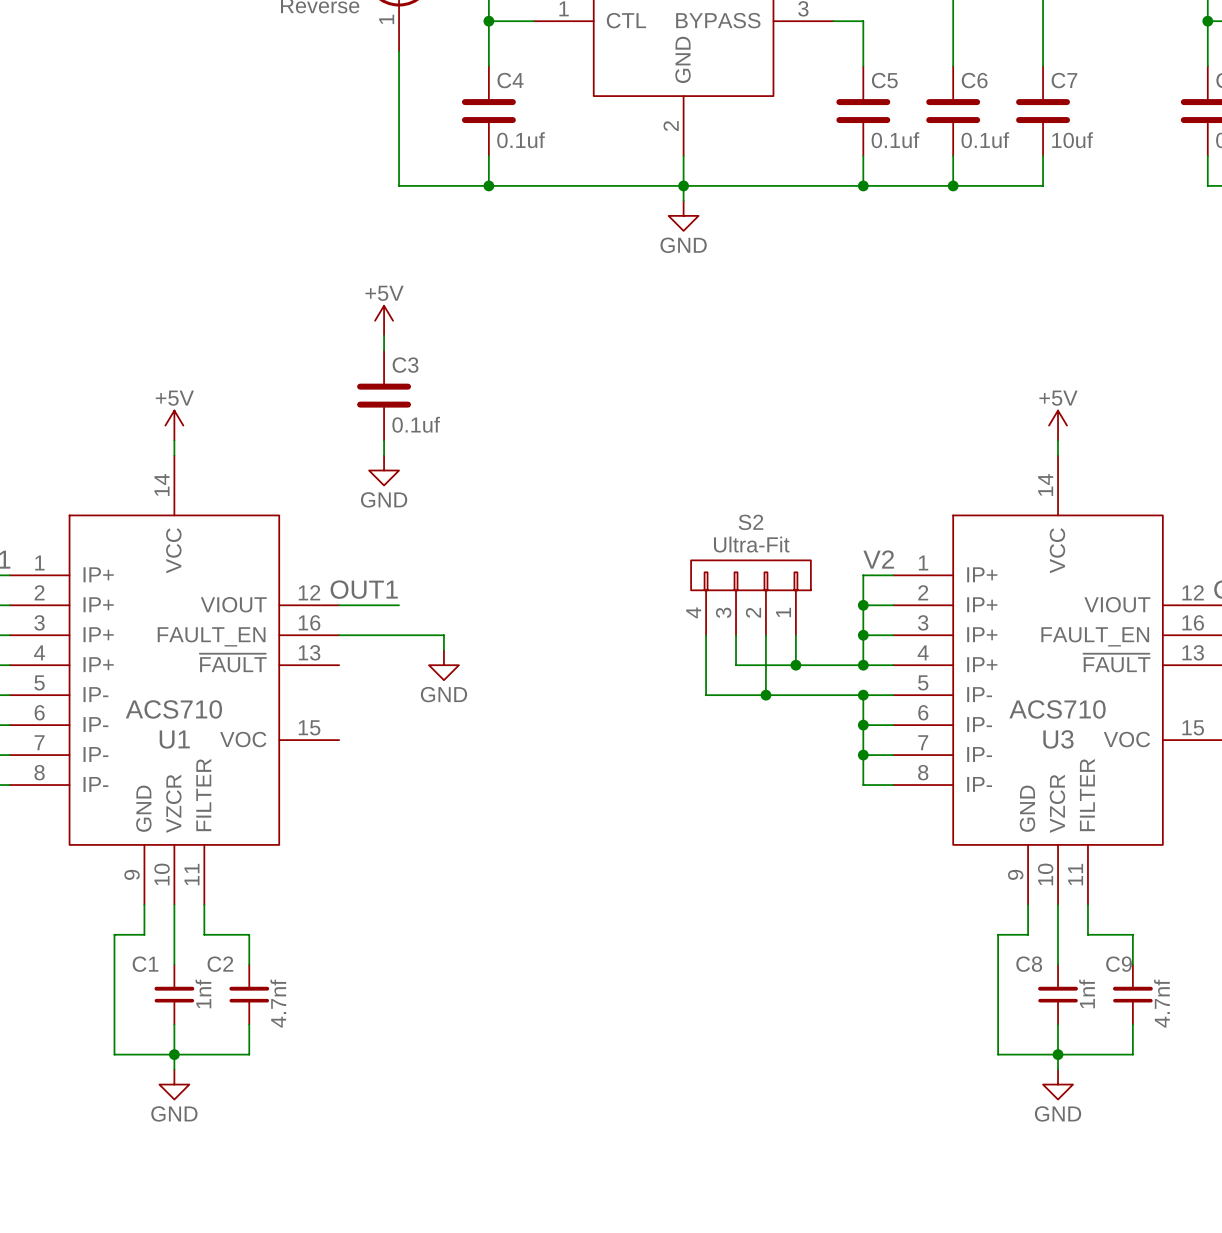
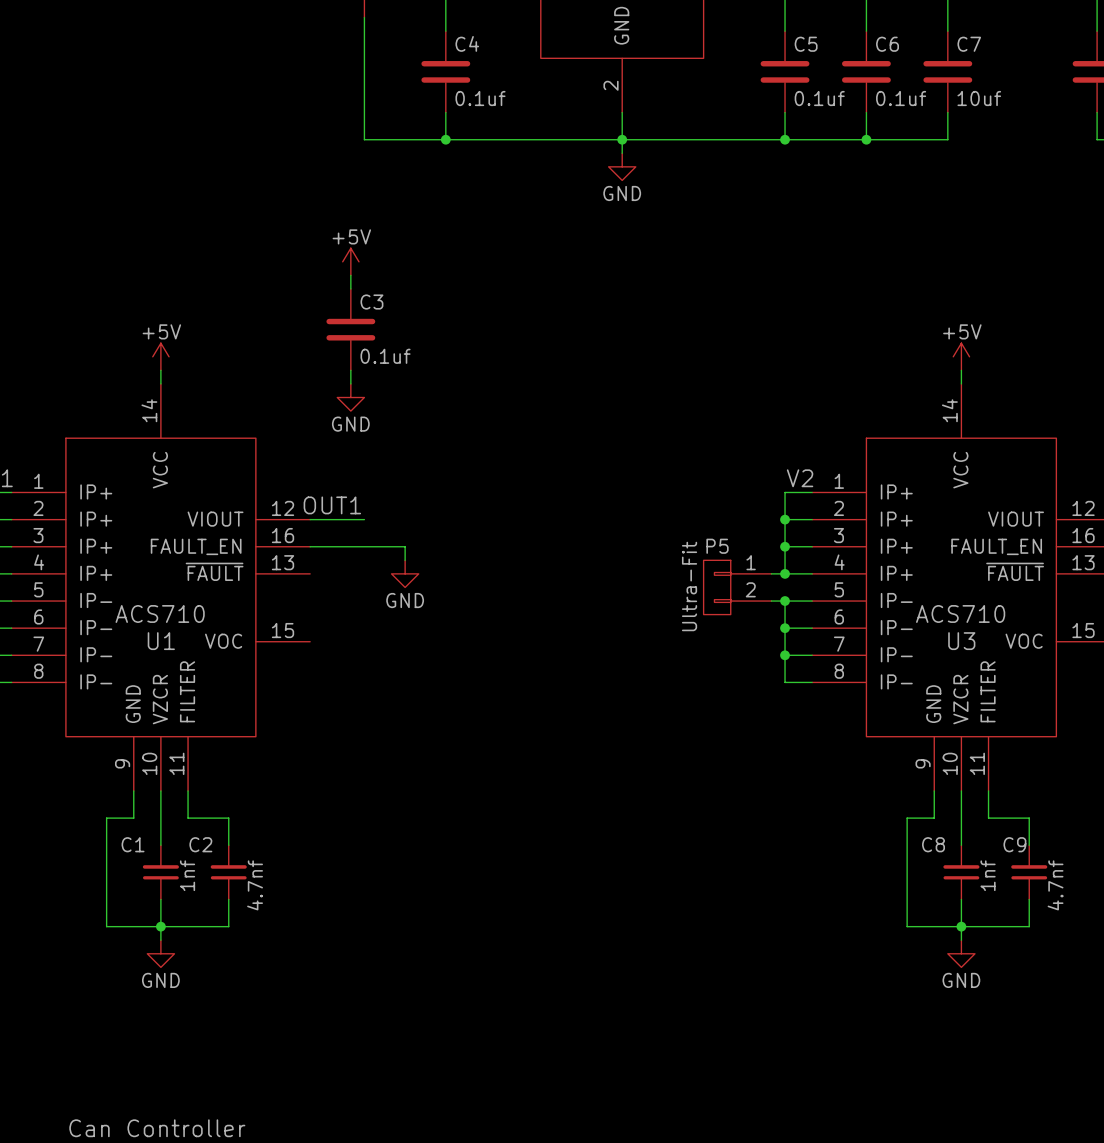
S2: Ultra-Fit (750, 597) -> none
wire: (706, 635) (706, 695) (848, 695) -> none
wire: (736, 635) (736, 665) (848, 665) -> none
wire: (765, 635) (765, 695) -> none
wire: (795, 635) (795, 665) -> none
junction: (795, 665) -> none
P5: none -> Ultra-Fit (737, 587)
junction: (765, 695) -> none

